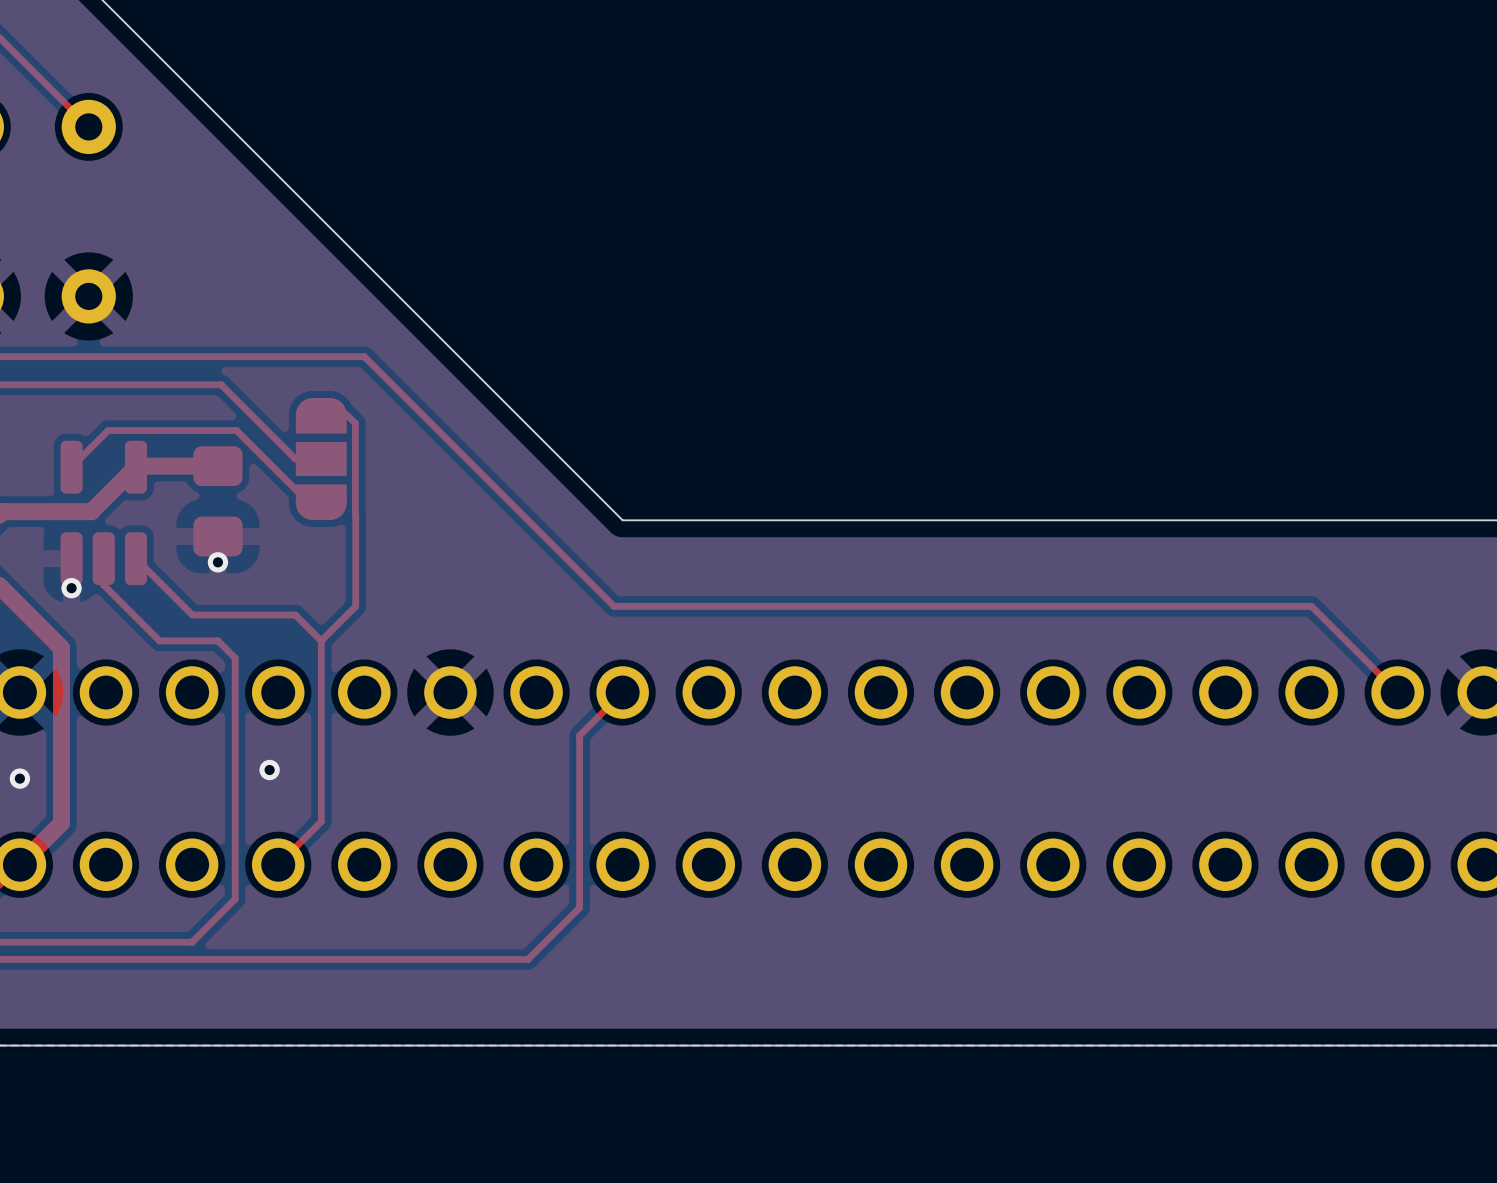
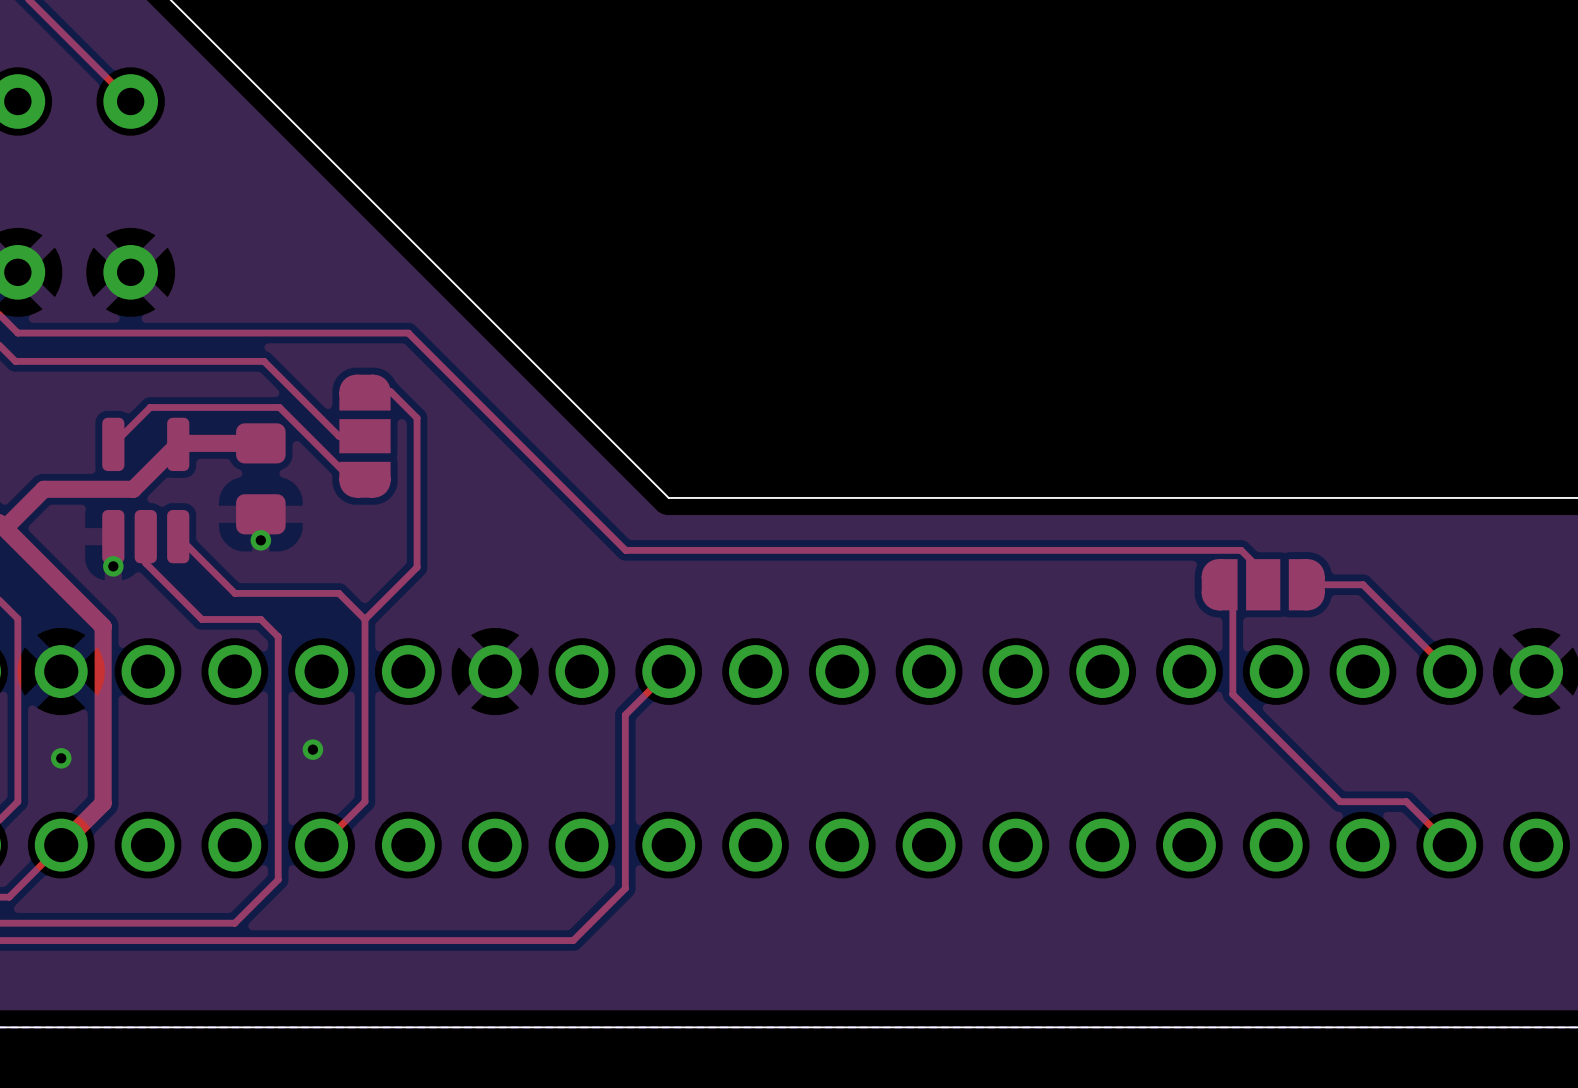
top track: (355, 423) (355, 513) -> none
top track: (355, 514) (355, 606) -> (399, 400) (417, 418) (417, 567) (399, 584)
top track: (579, 572) (614, 606) (1256, 606) -> (625, 550) (1241, 550) (1263, 572) (1263, 584)
top track: none -> (1218, 584) (1232, 598) (1232, 694) (1340, 801) (1406, 801) (1449, 845)
part: none -> (1263, 584)

